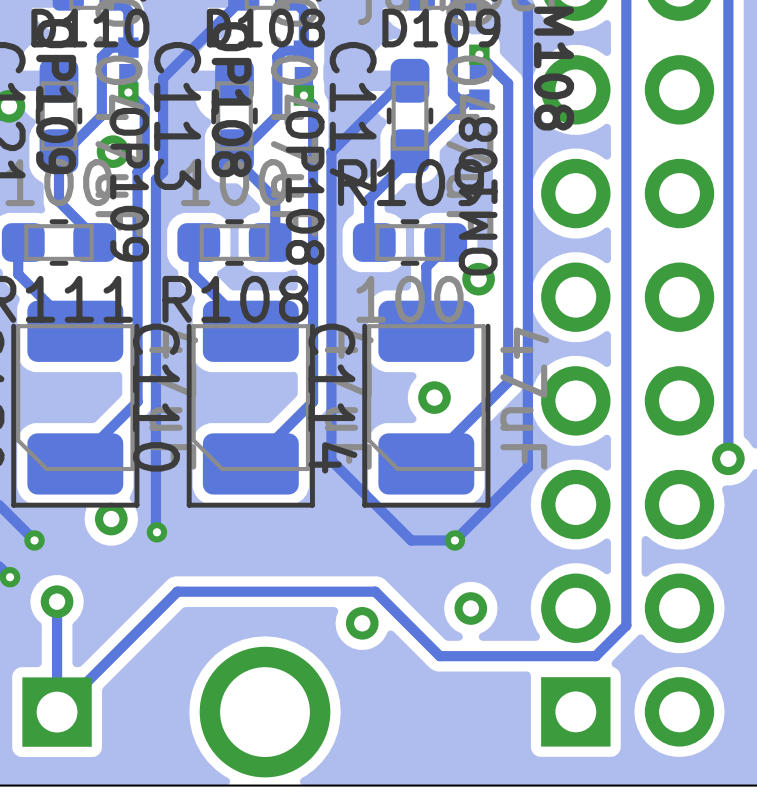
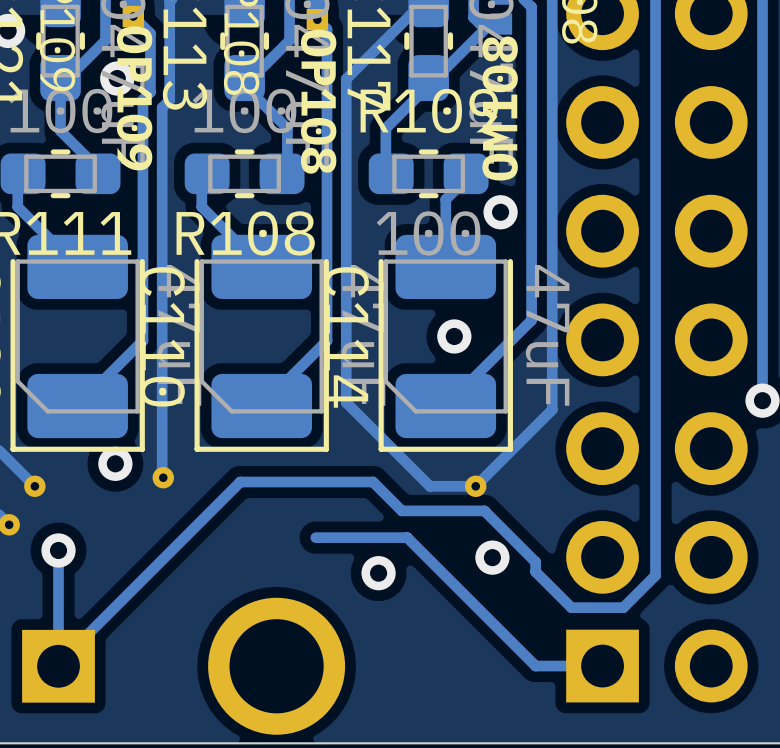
track: none -> (315, 537) (407, 537) (535, 666) (602, 666)
track: (546, 656) (439, 656) (375, 591) (177, 591) (57, 712) -> (571, 607) (535, 571) (535, 562) (484, 510) (401, 510) (373, 482) (240, 482) (58, 663)

